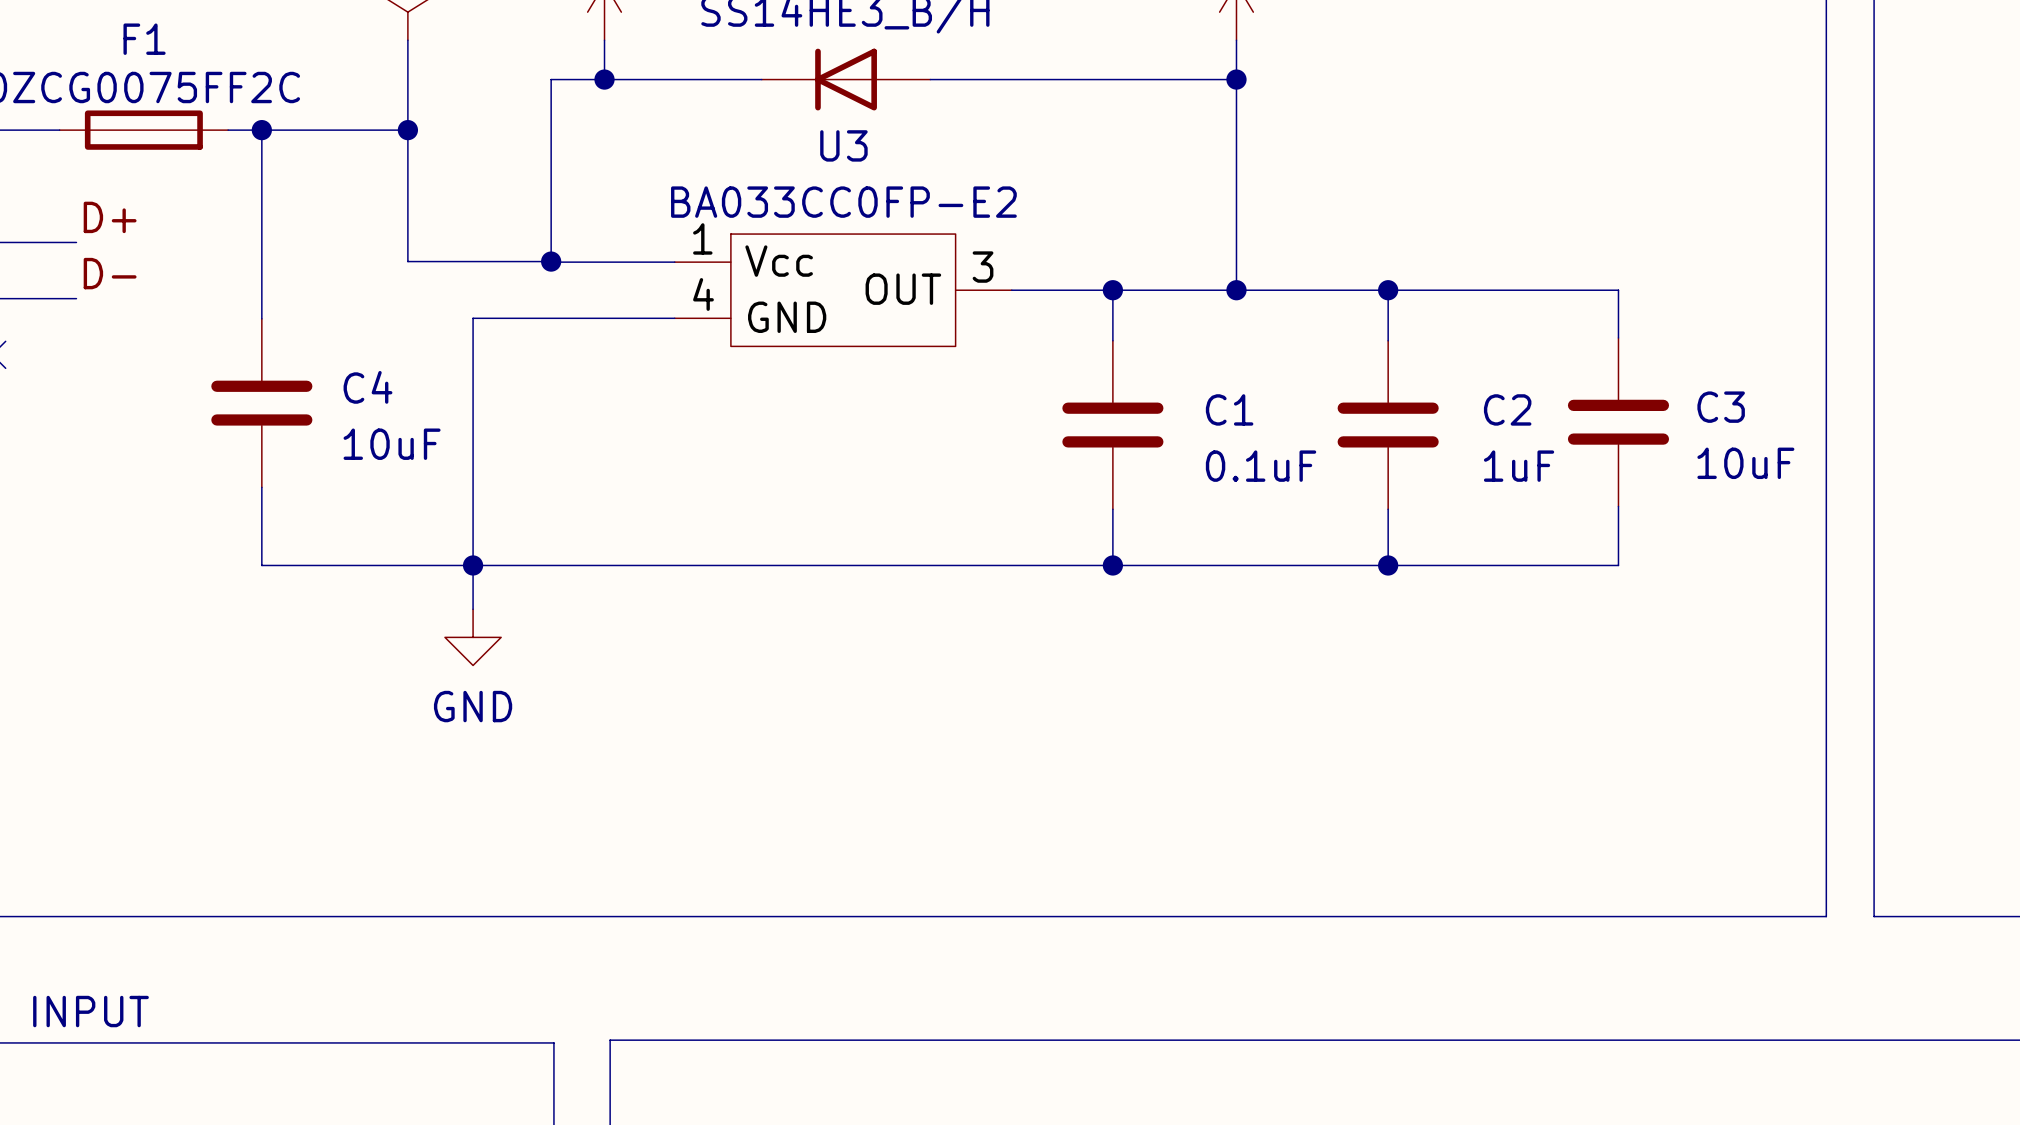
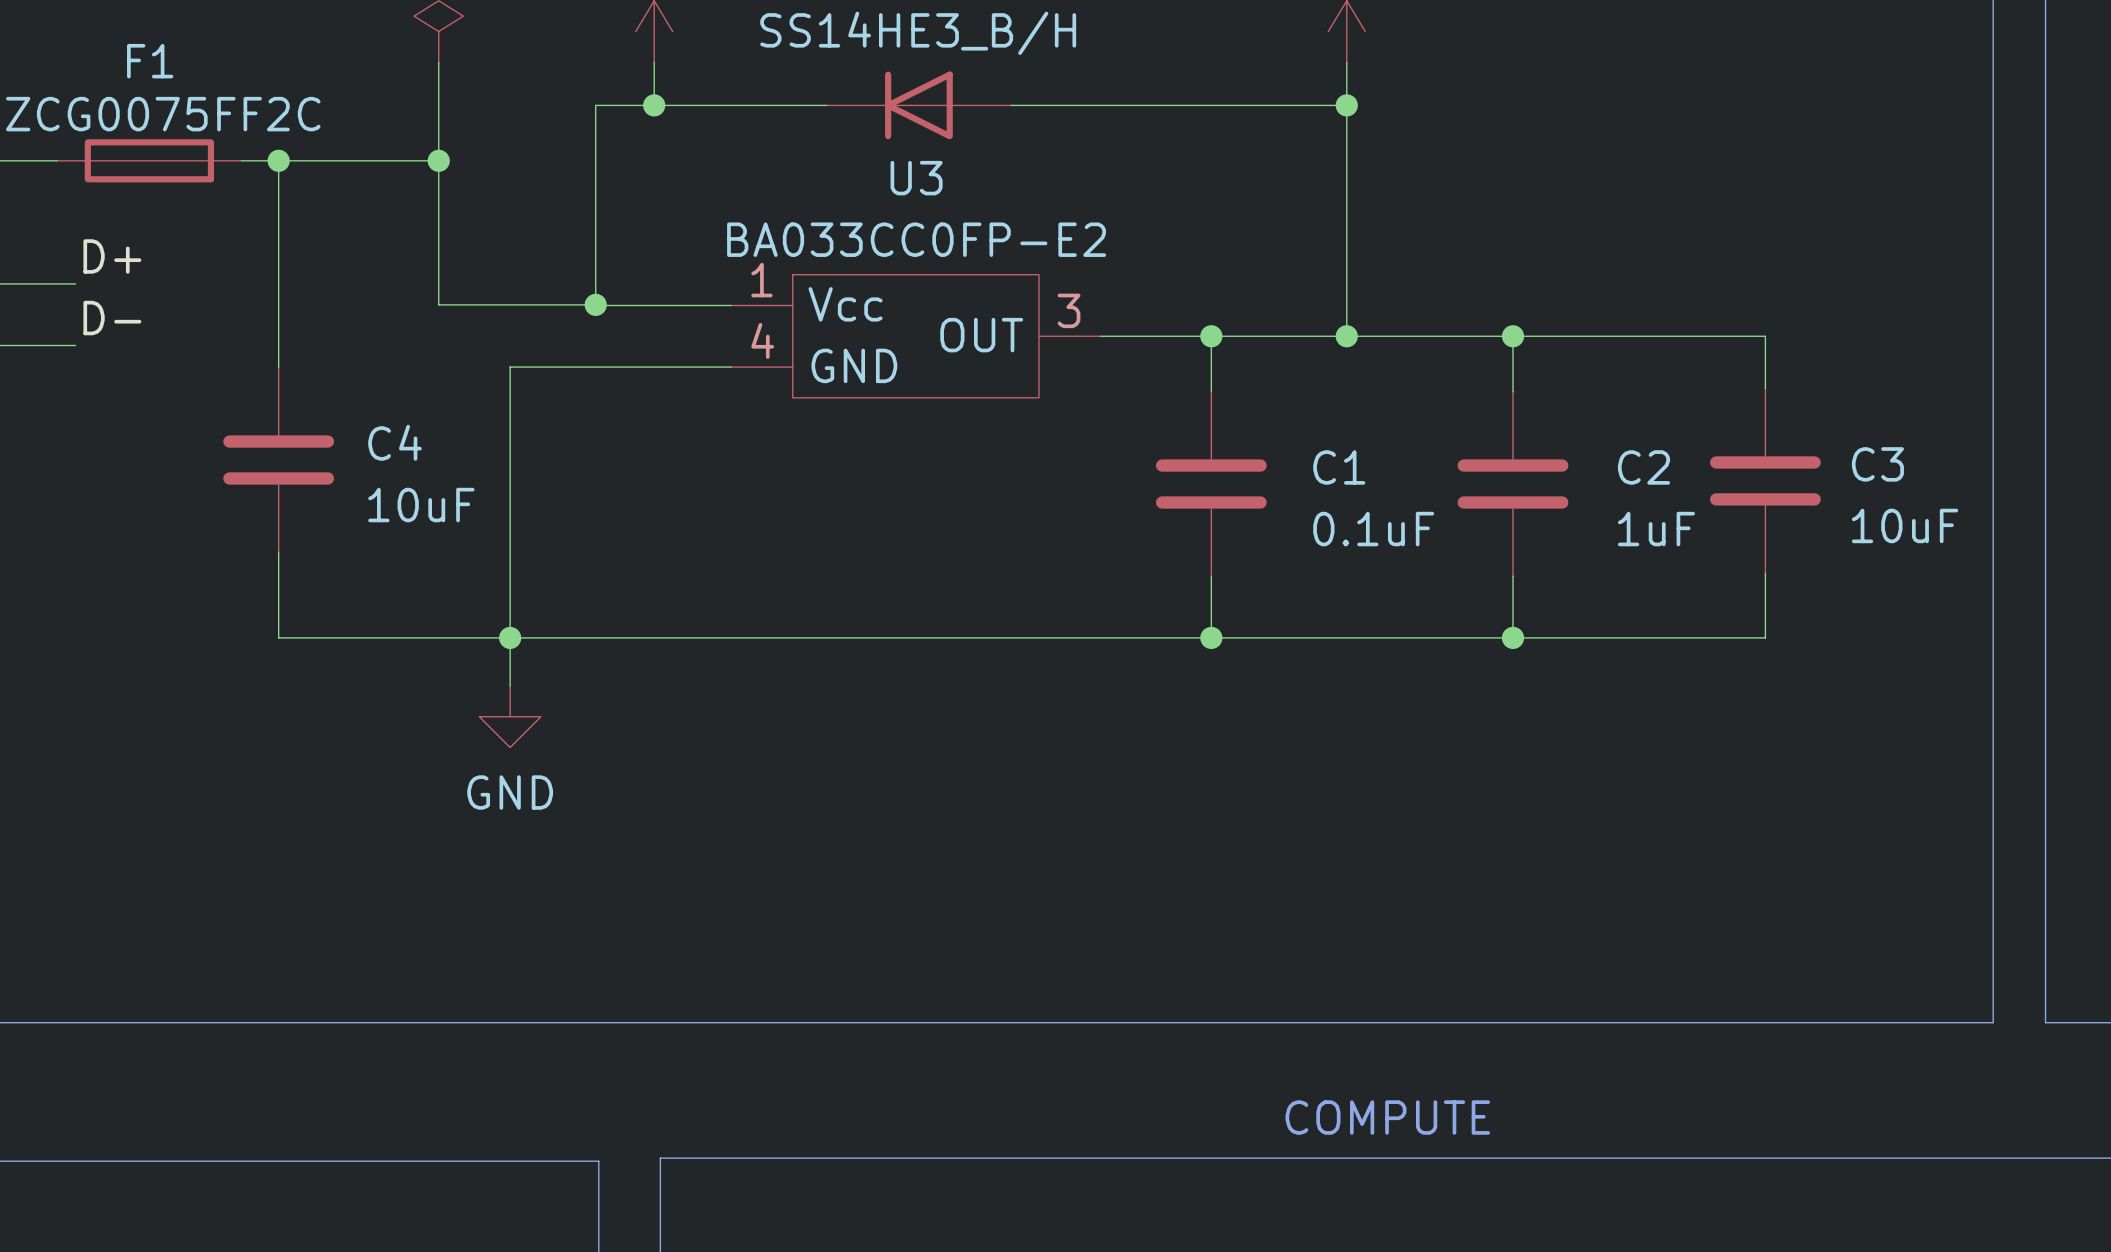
text: none -> COMPUTE (1387, 1117)
text: INPUT (90, 1011) -> none

